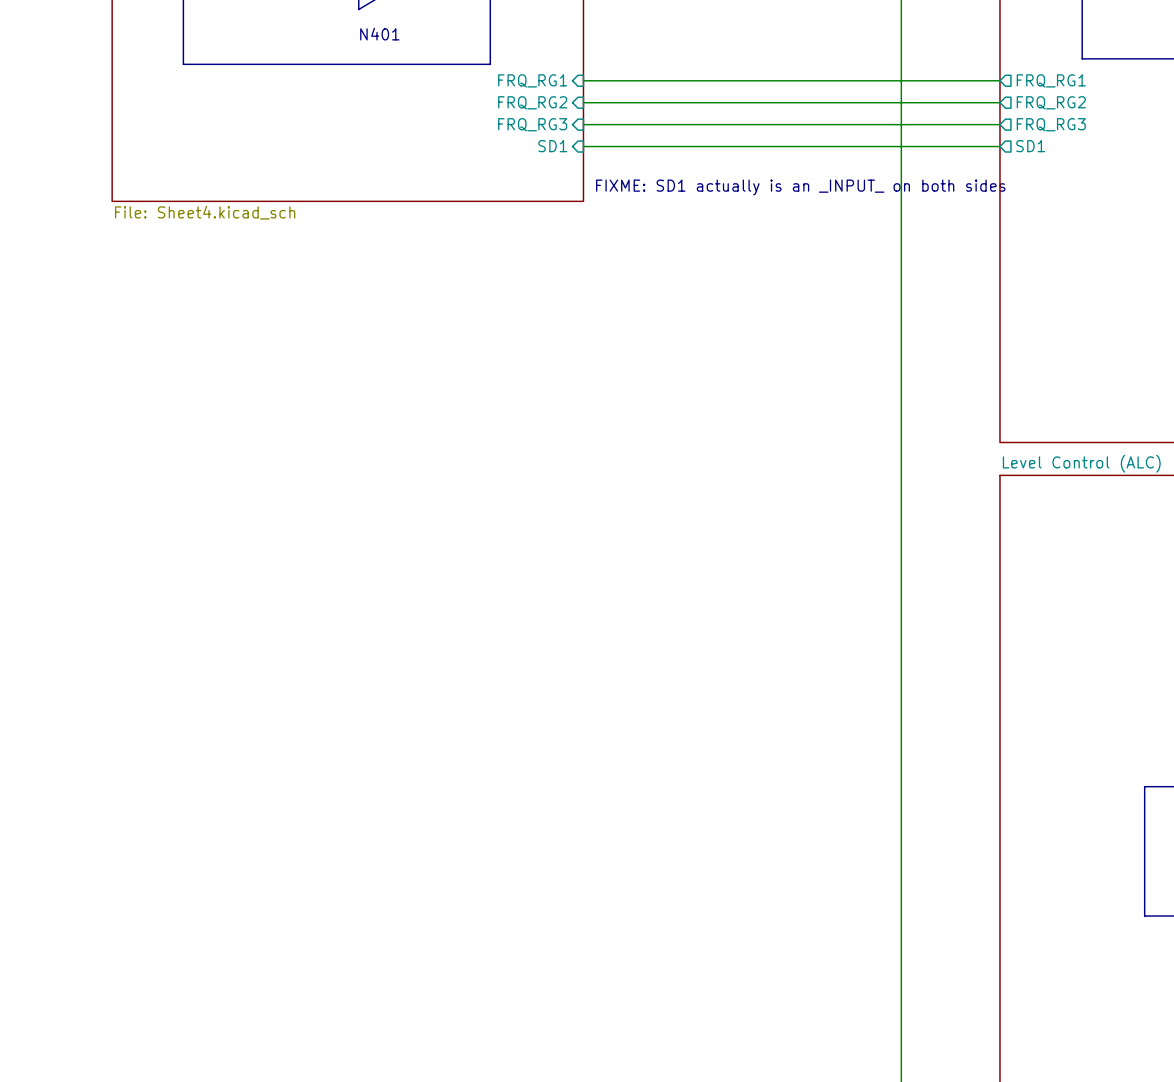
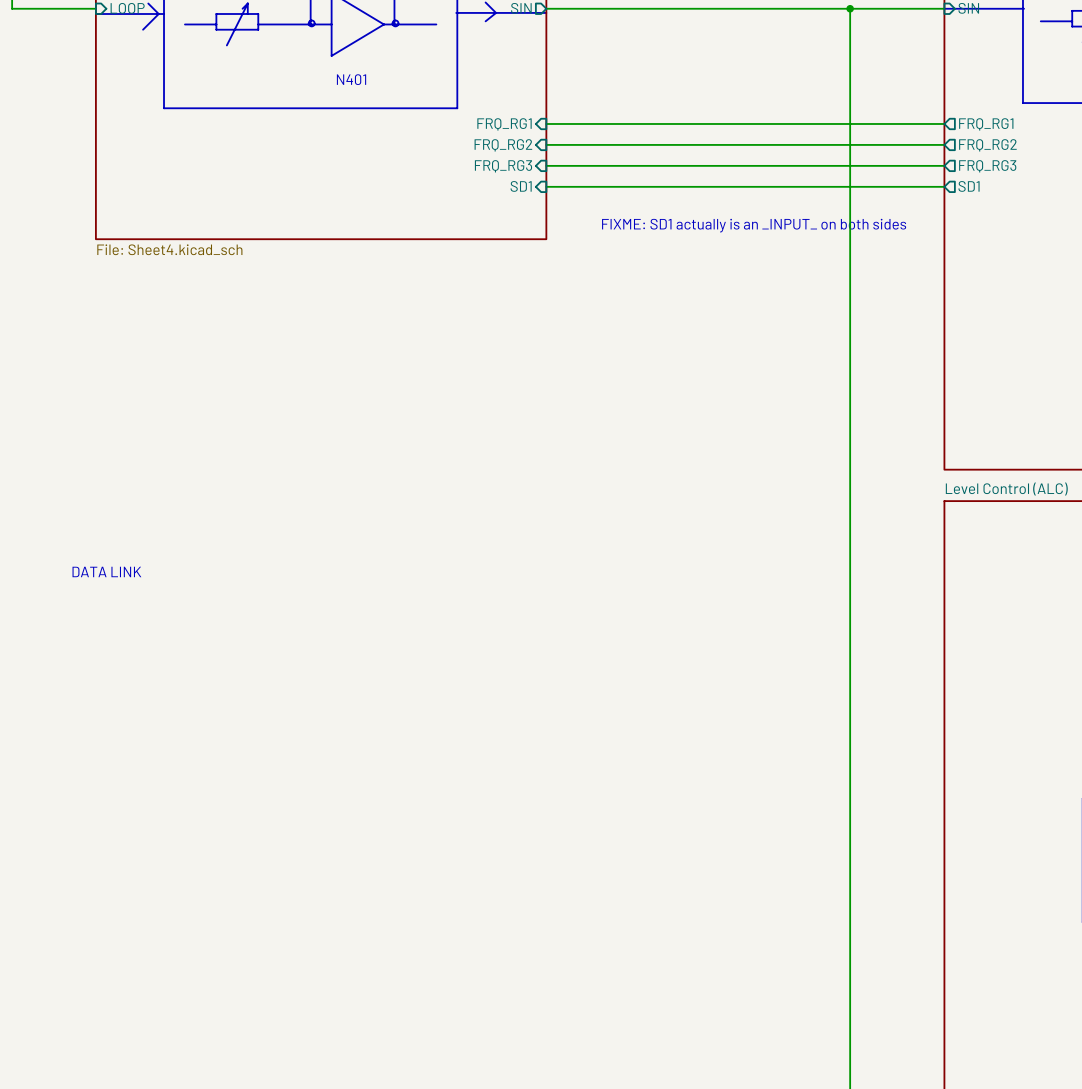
text: none -> DATA LINK (106, 571)

